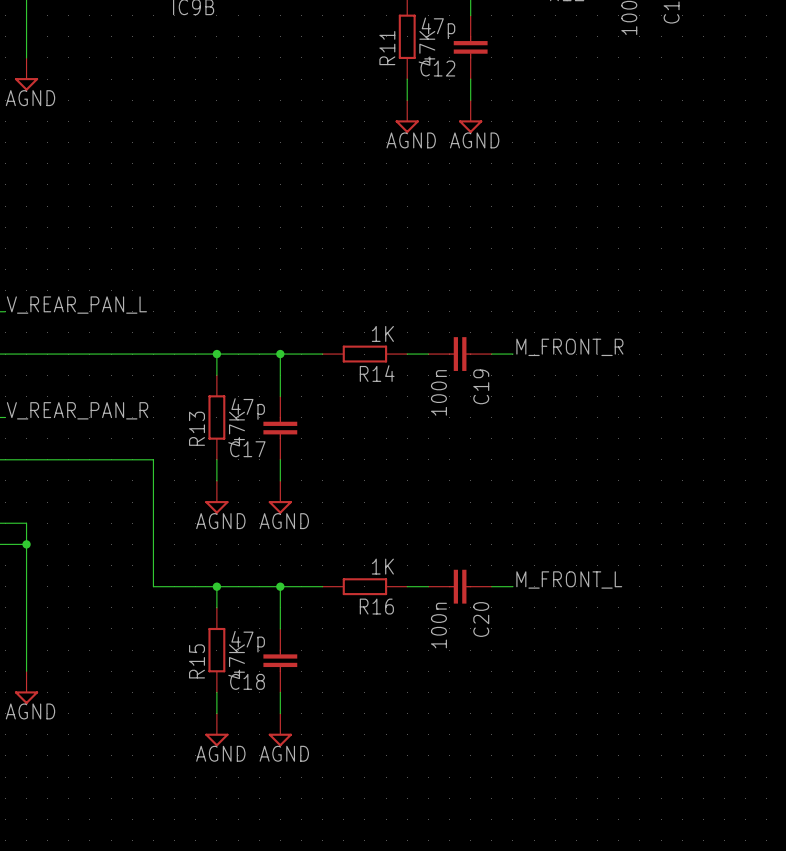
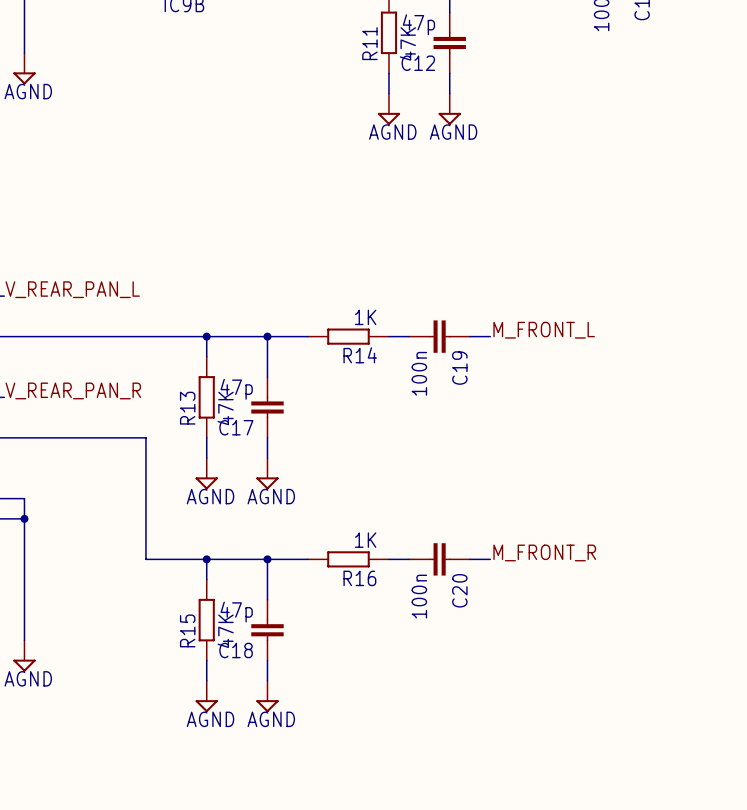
label: M_FRONT_R (569, 347) -> M_FRONT_L (544, 330)
label: M_FRONT_L (569, 579) -> M_FRONT_R (544, 552)

